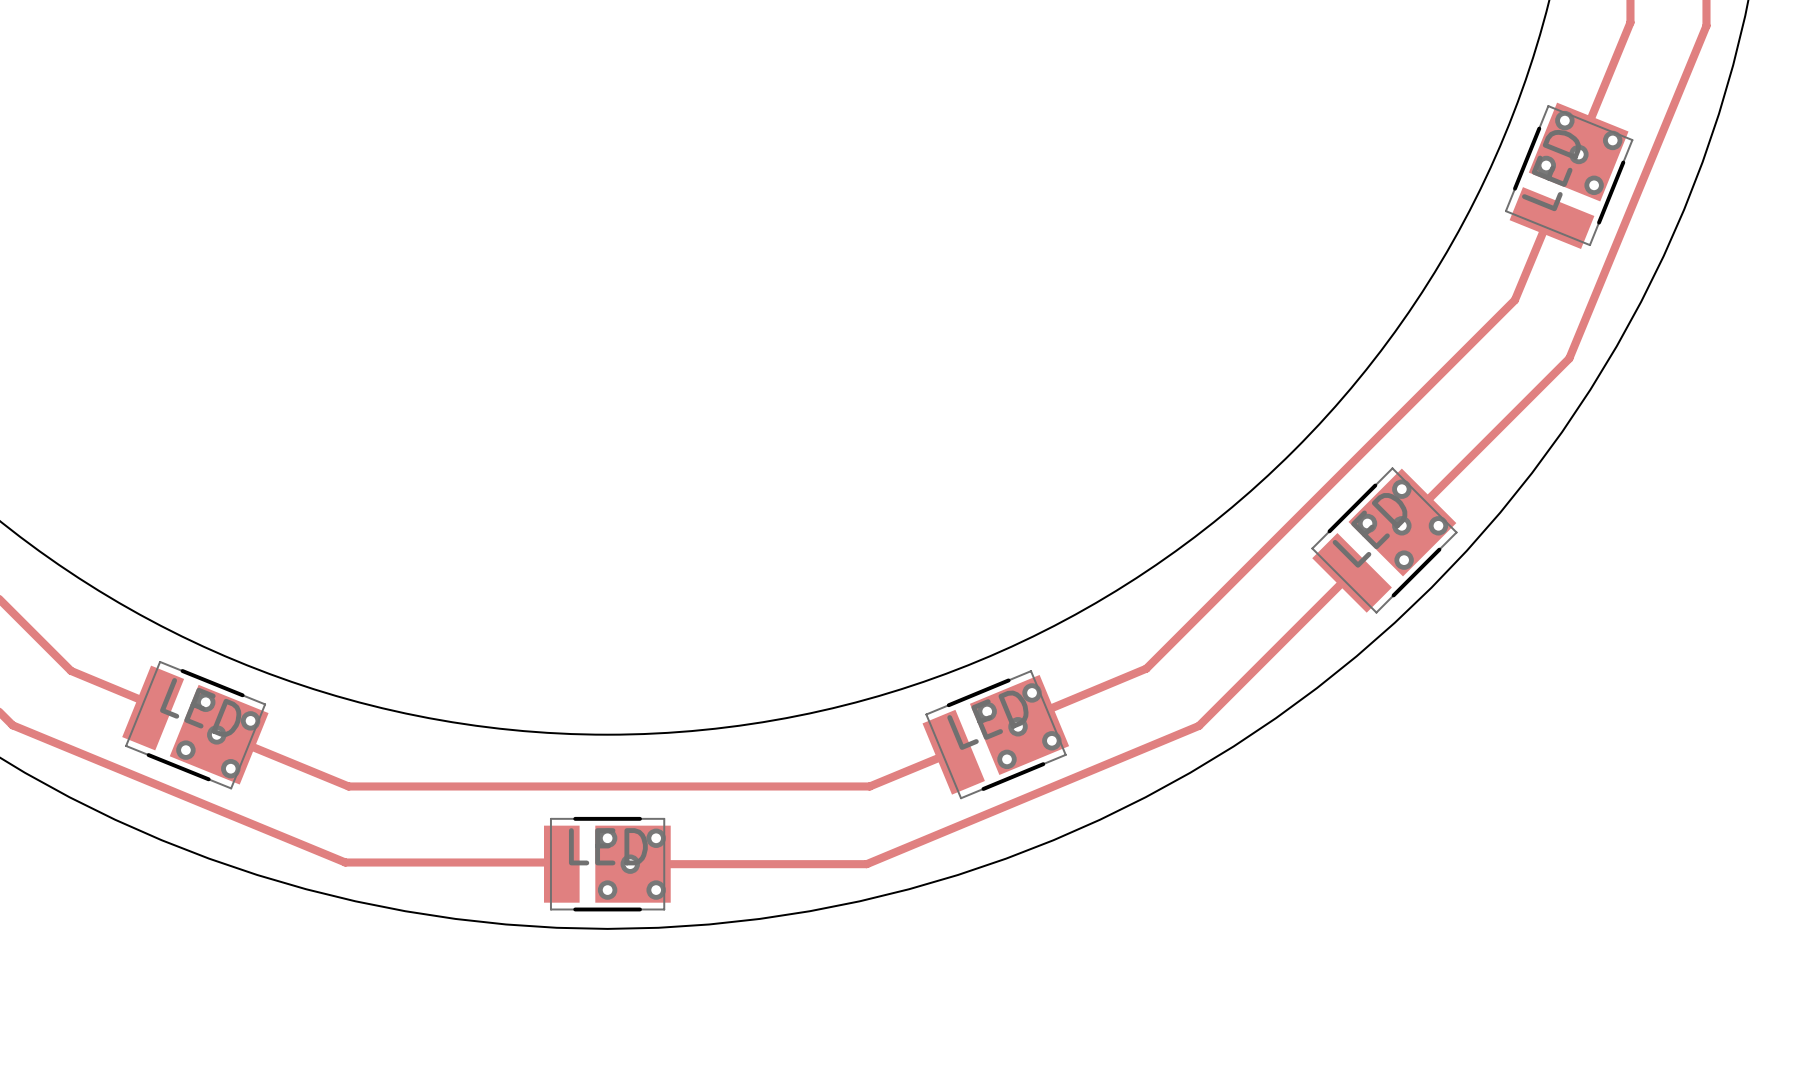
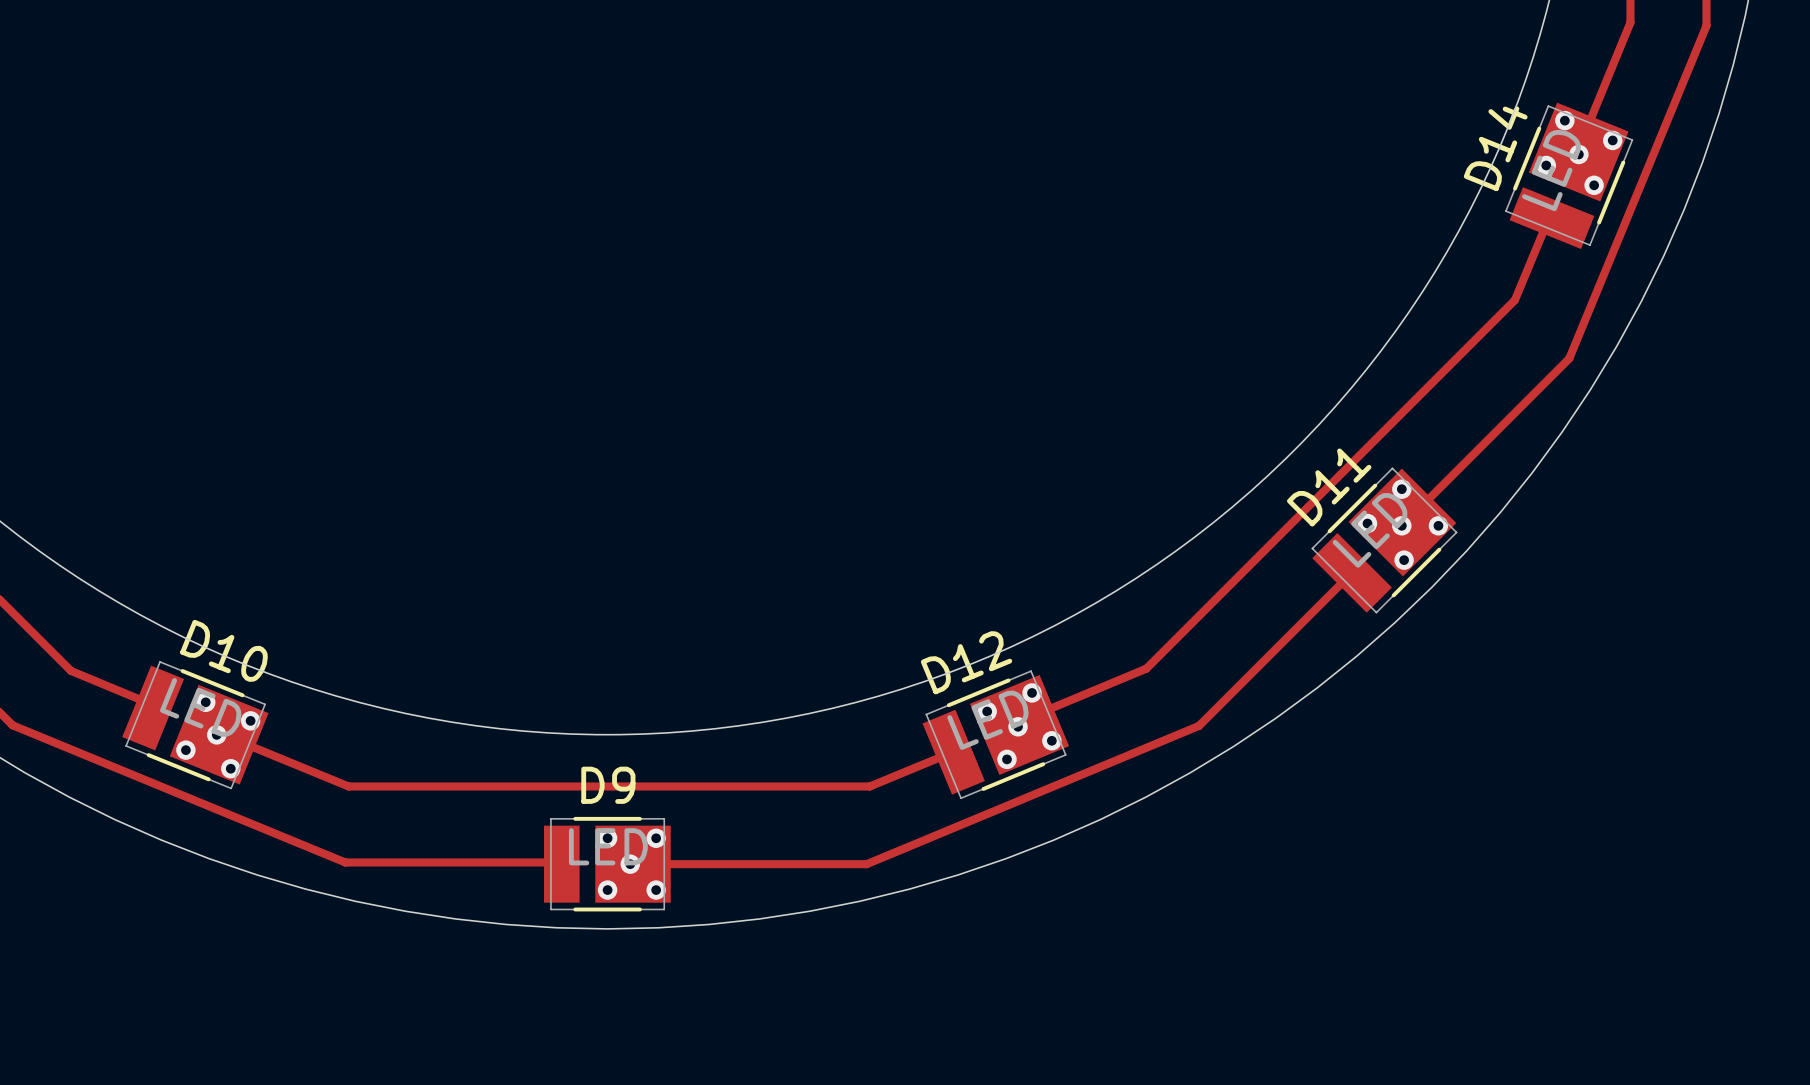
D14 name: none -> D14 (1495, 148)
D11 name: none -> D11 (1329, 487)
D10 name: none -> D10 (224, 650)
D12 name: none -> D12 (966, 662)
D9 name: none -> D9 (608, 785)

